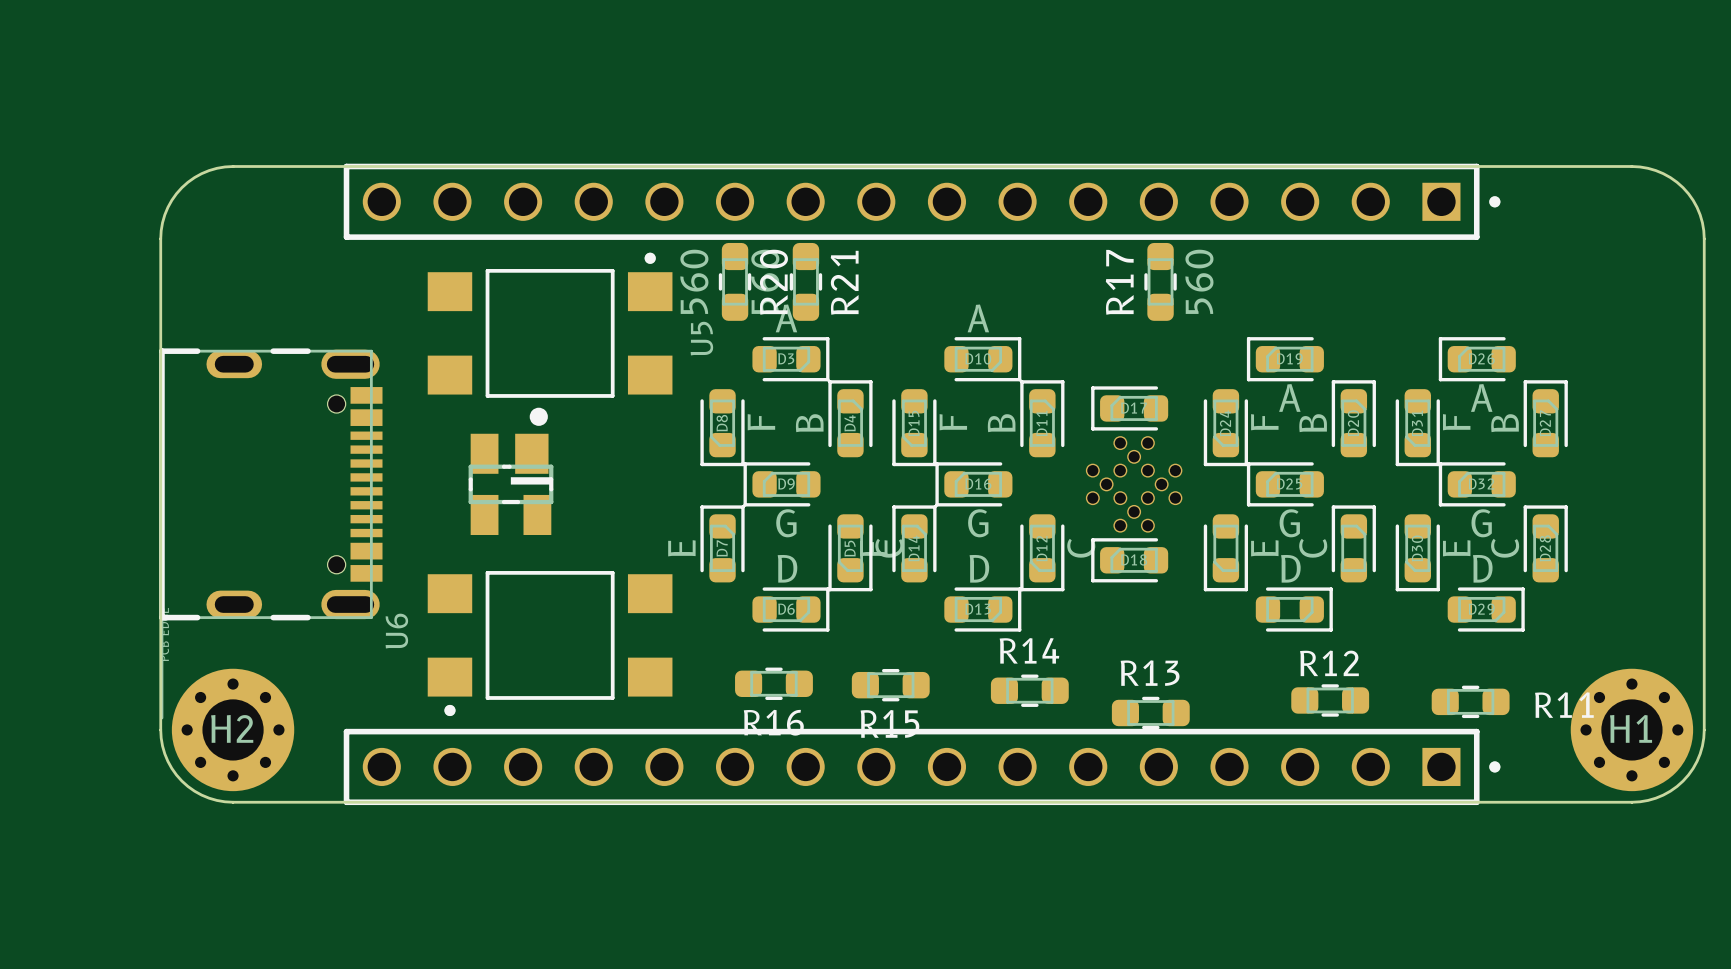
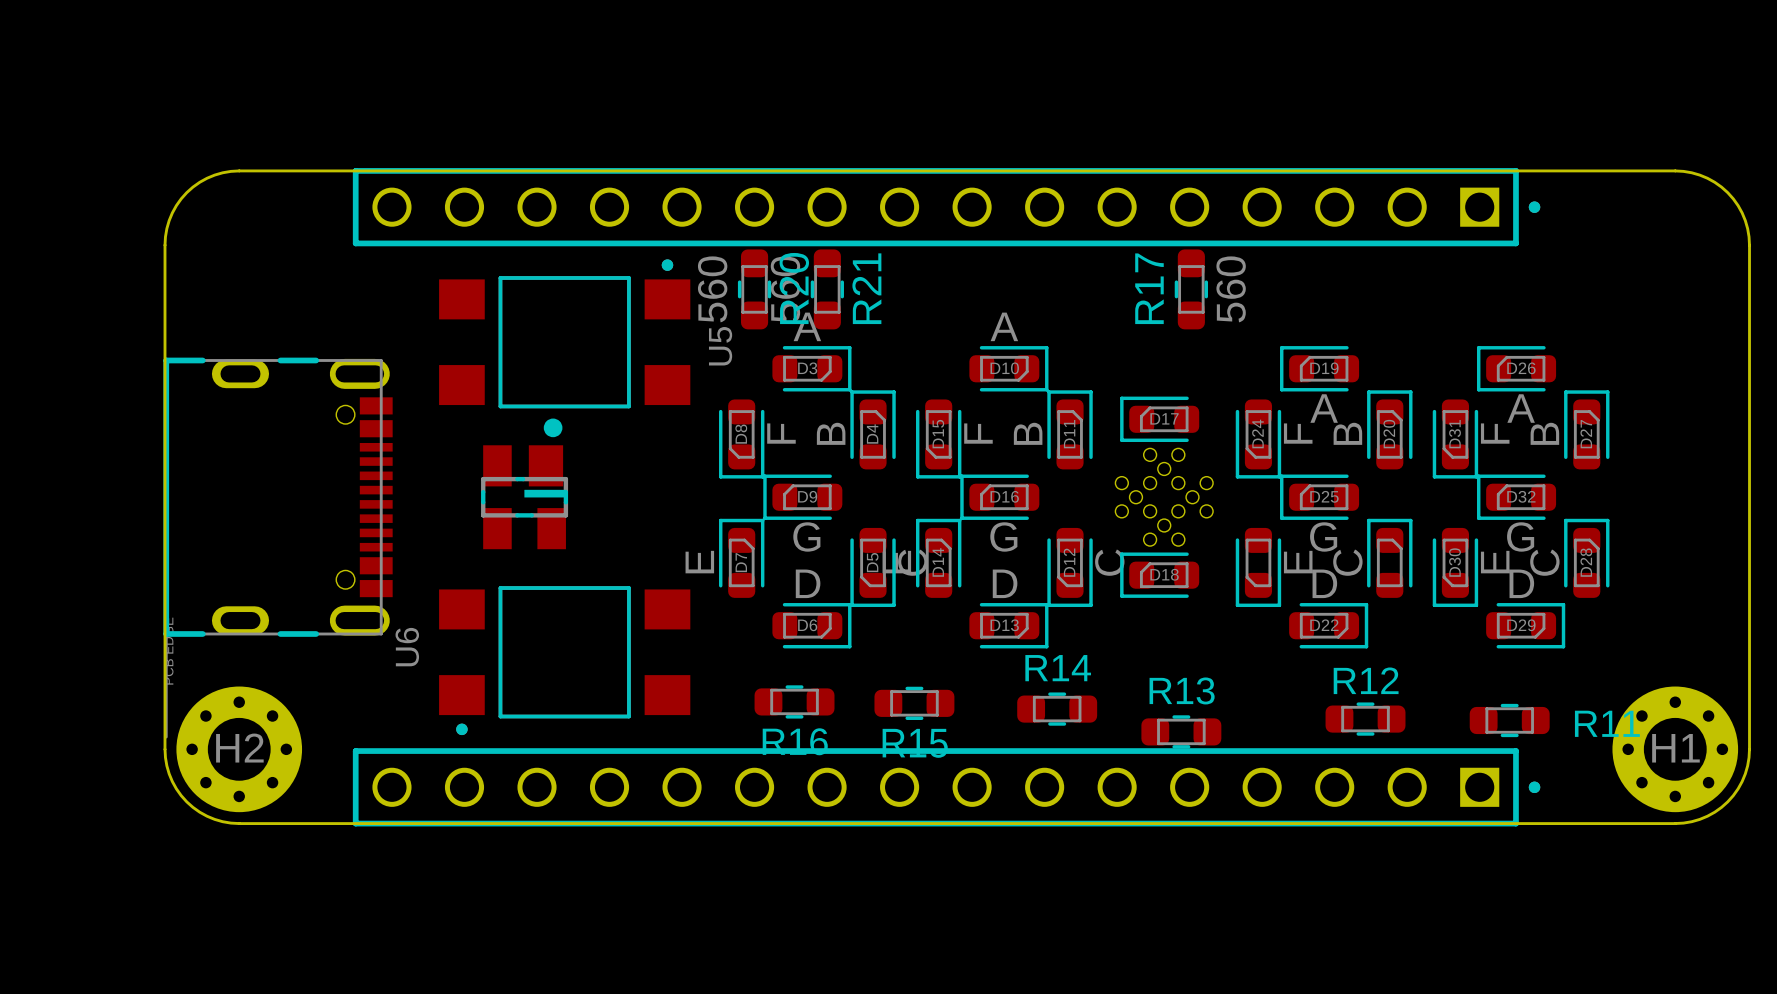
D22 name: none -> D22 (1324, 625)

